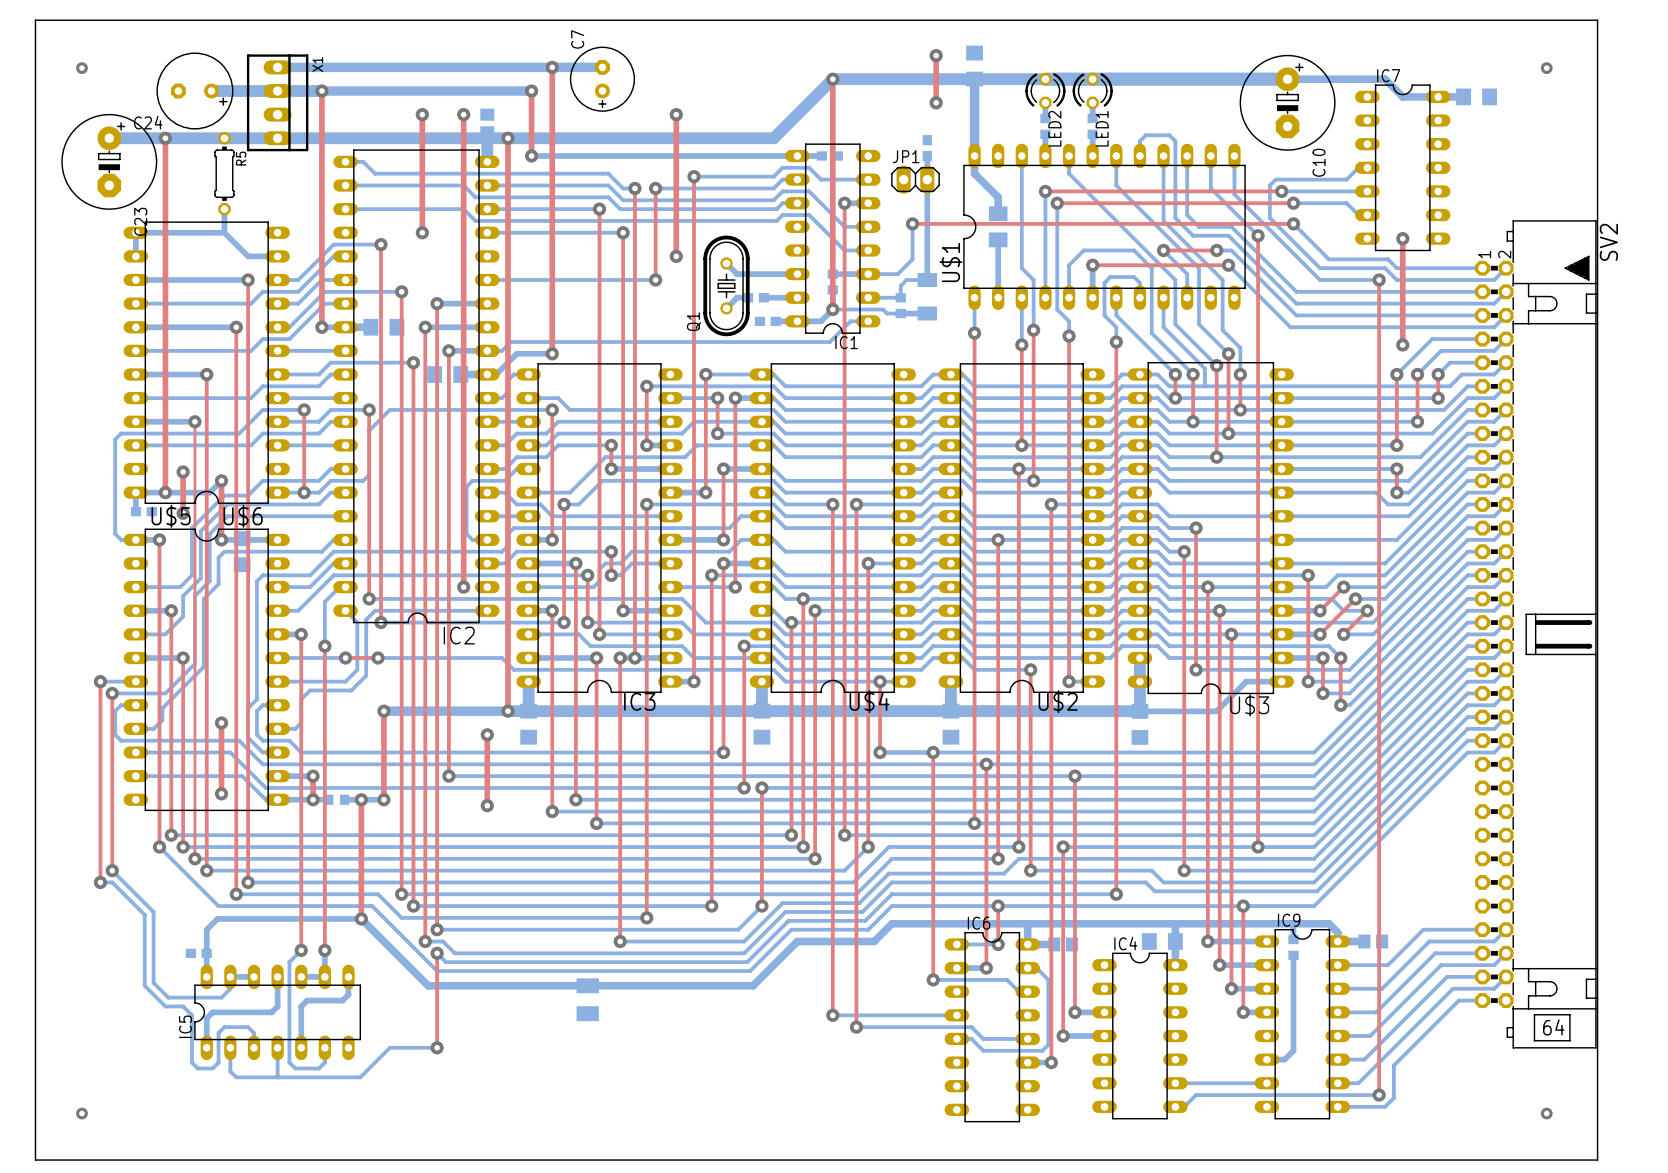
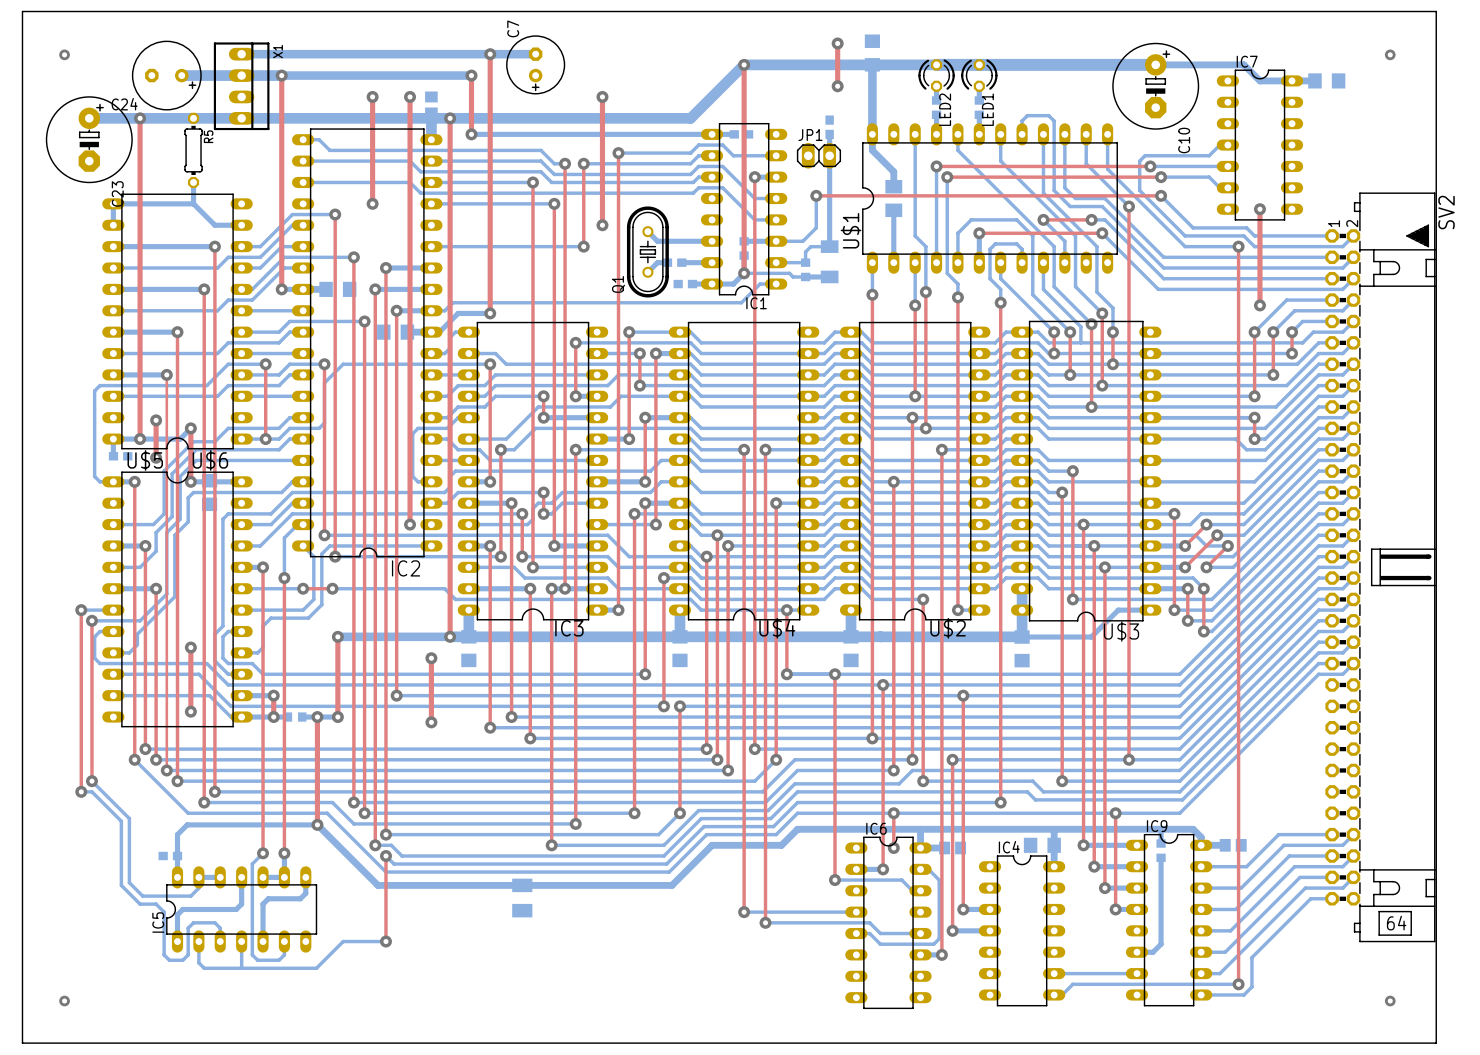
bottom track: (956, 944) (998, 944) -> none

